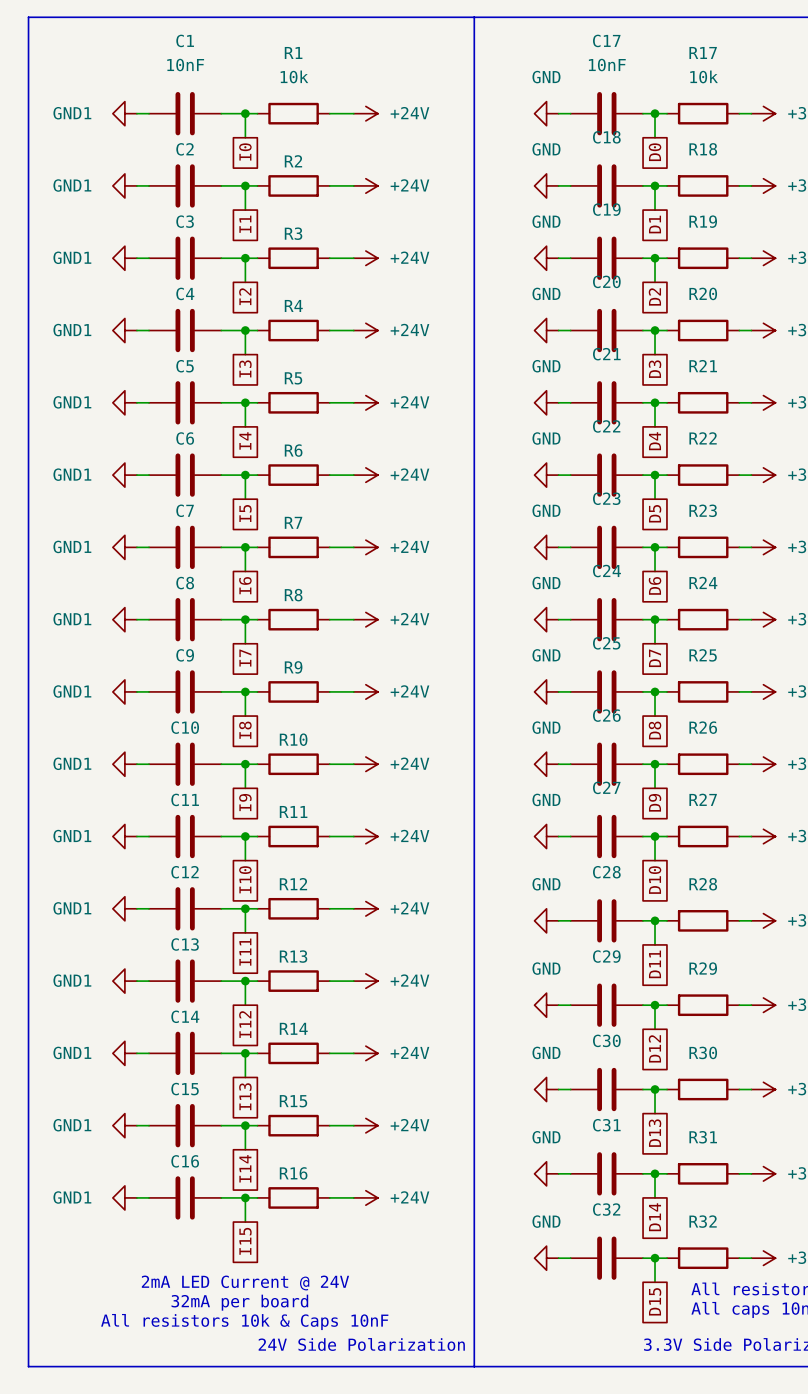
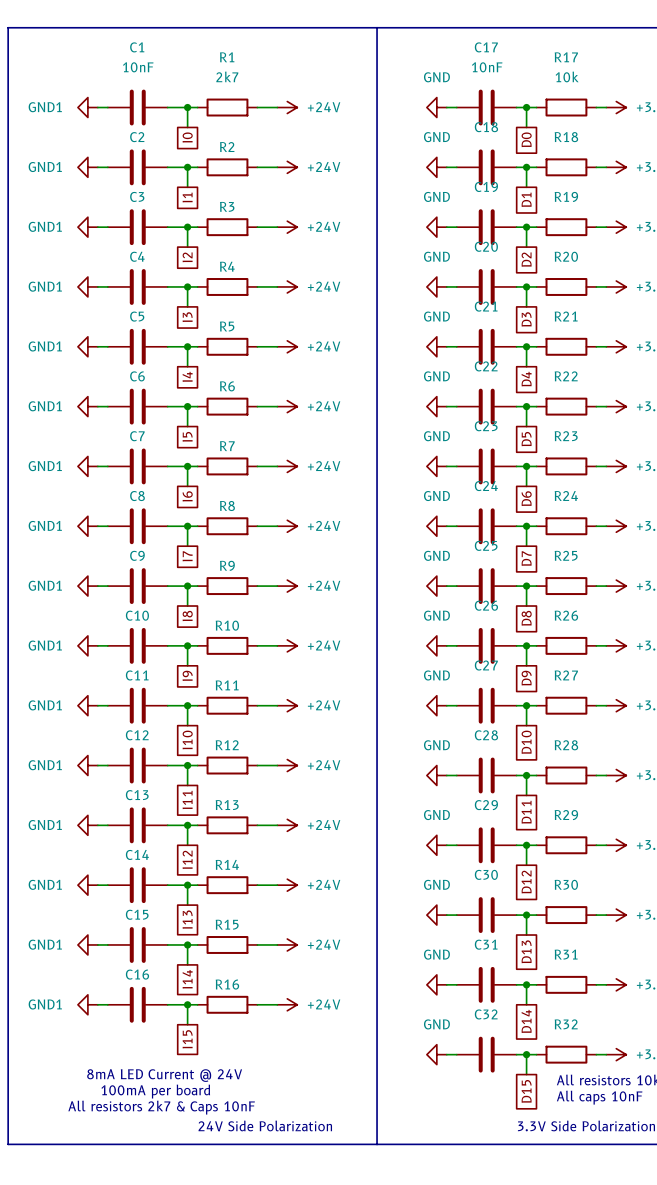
R1 value: 10k (294, 76) -> 2k7 (227, 76)
text: 2mA LED Current @ 24V (245, 1282) -> 8mA LED Current @ 24V (164, 1075)
text: 32mA per board (239, 1302) -> 100mA per board (155, 1091)
text: All resistors 10k & Caps 10nF (244, 1322) -> All resistors 2k7 & Caps 10nF (161, 1107)

